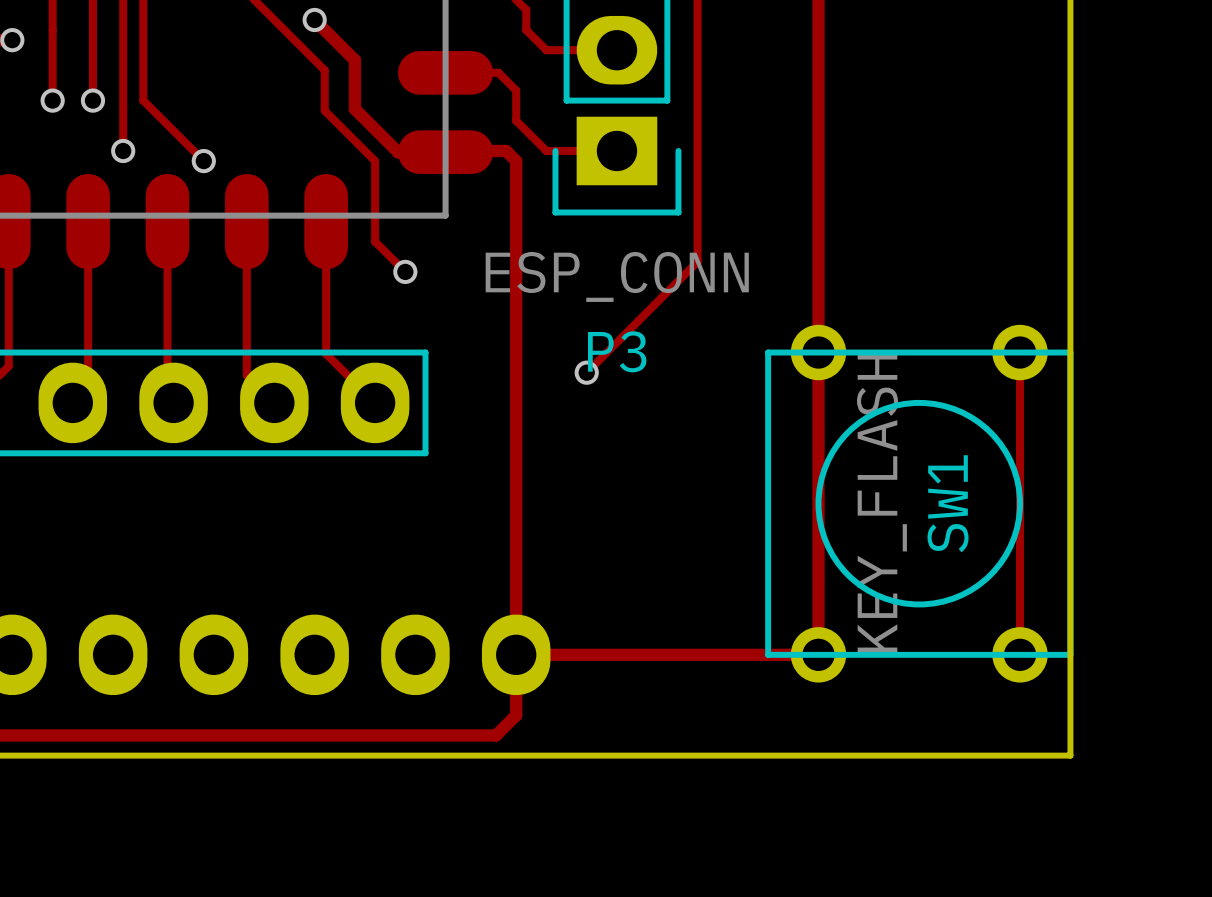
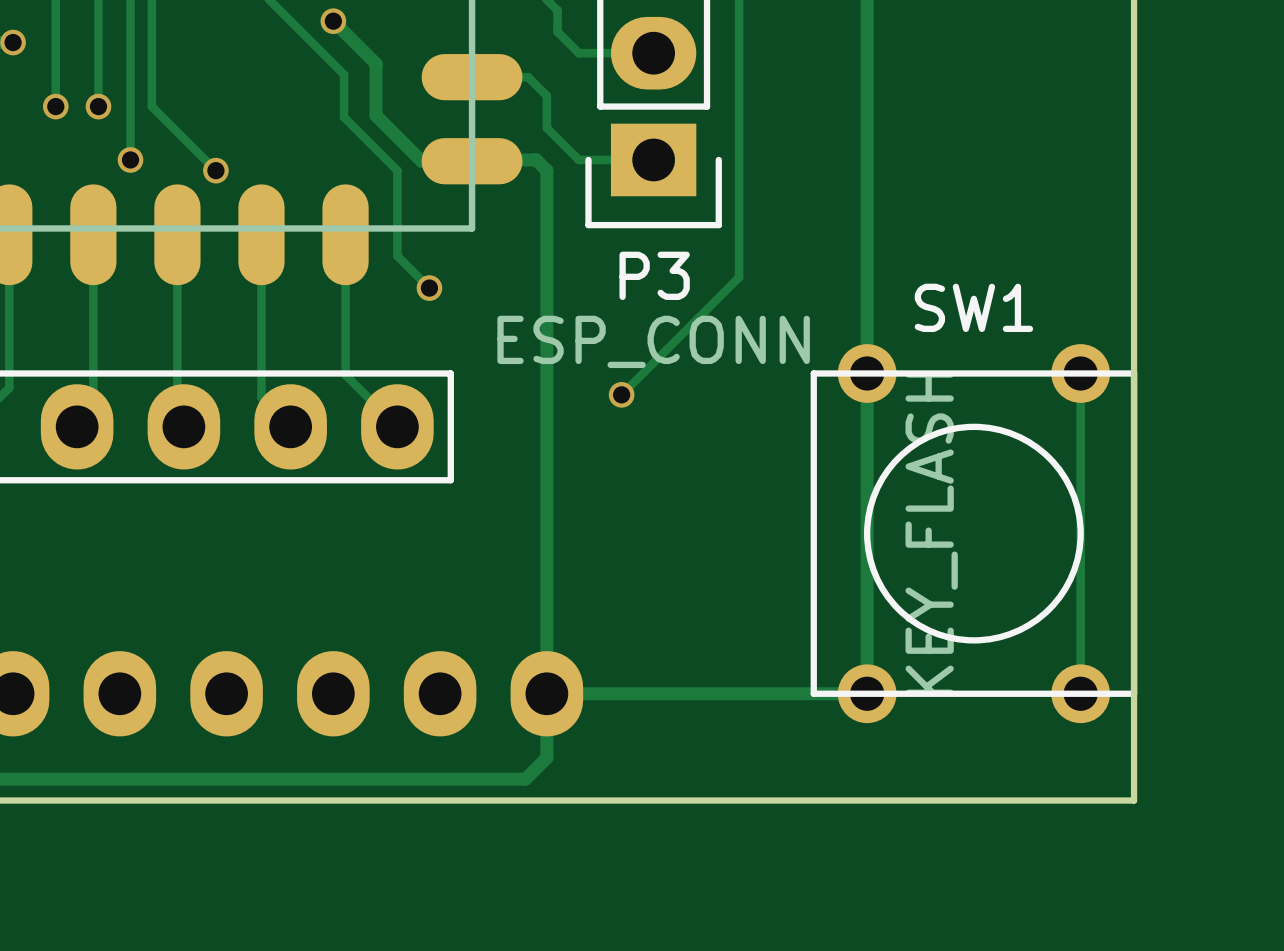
P3 value position: ESP_CONN (617, 276) -> ESP_CONN (653, 341)
P3 name position: P3 (617, 351) -> P3 (654, 275)
SW1 name rotation: 0° (948, 503) -> 90° clockwise (973, 307)
SW1 name position: SW1 (948, 503) -> SW1 (973, 307)

